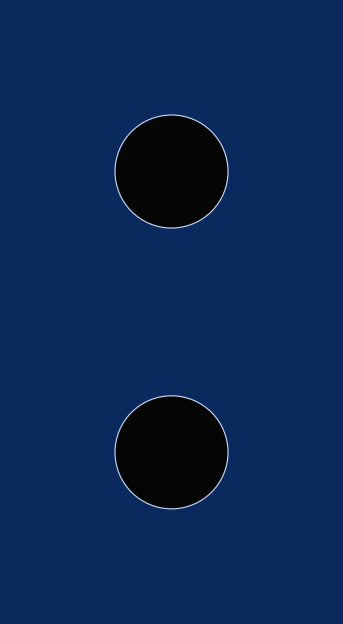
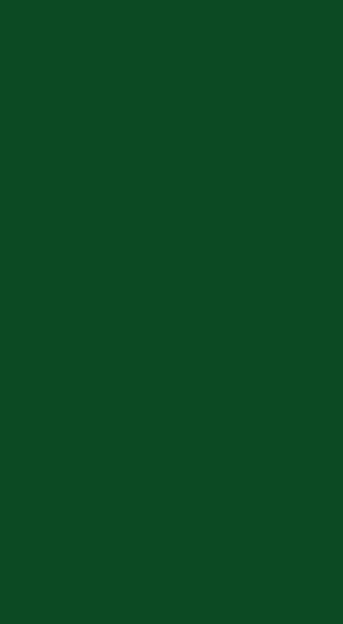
part: (171, 171) -> none
part: (171, 452) -> none

